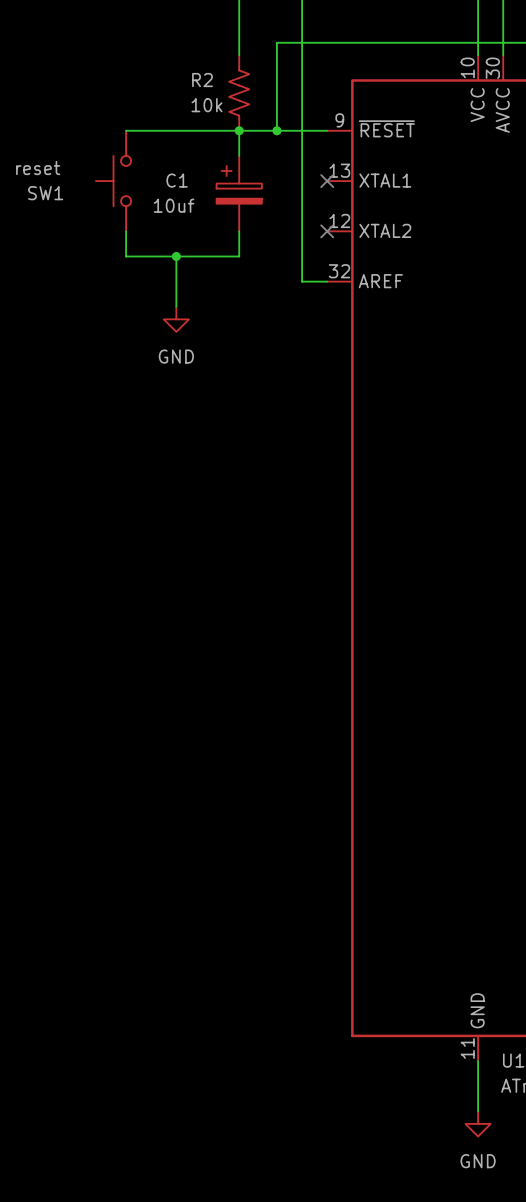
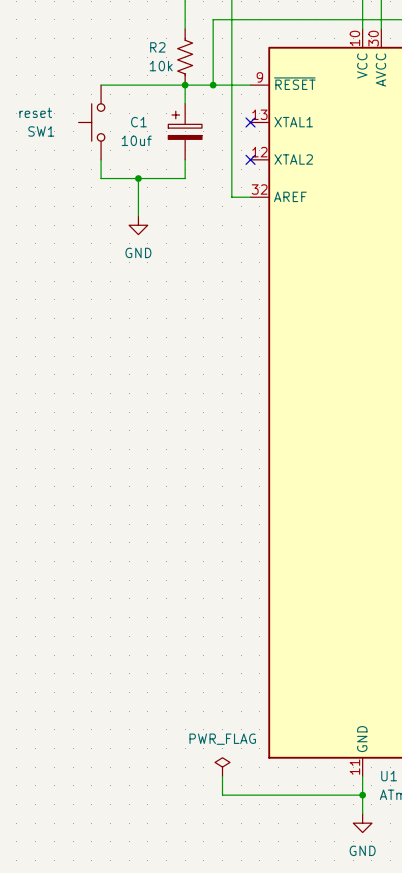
power symbol: none -> PWR_FLAG (222, 767)
wire: none -> (222, 776) (222, 795) (362, 795)
junction: none -> (362, 795)

